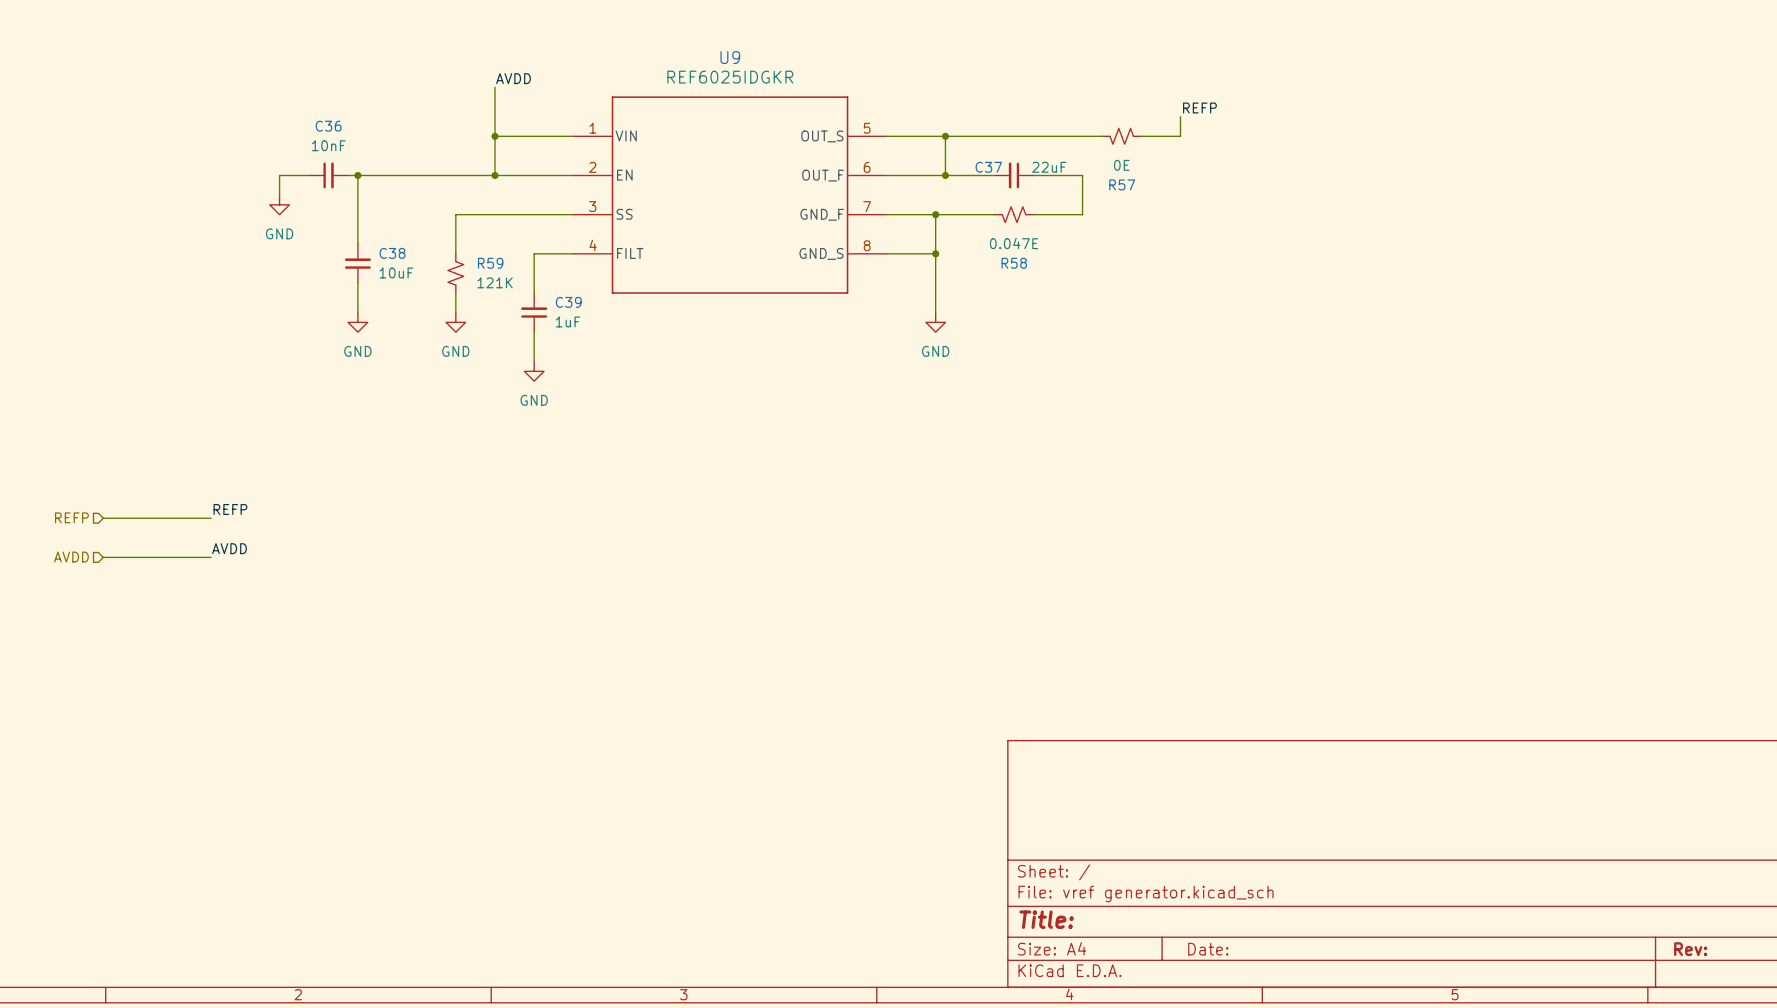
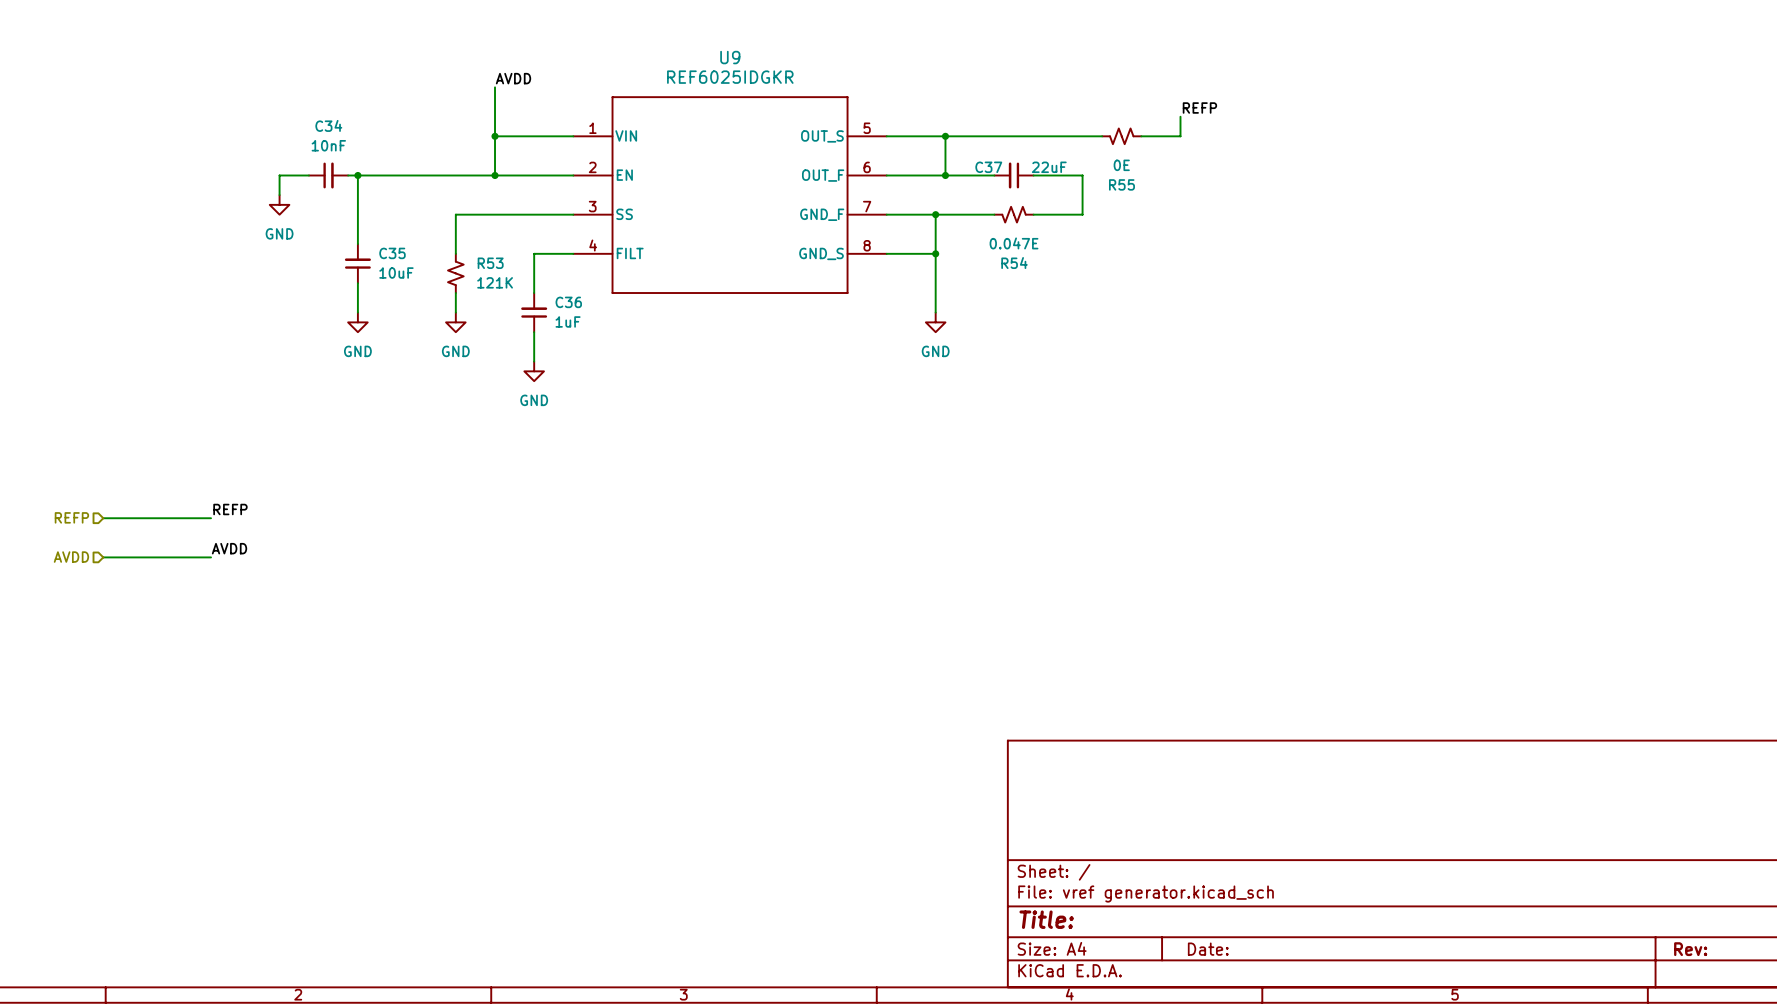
C36 name: C36 (328, 126) -> C34 (328, 125)
R57 name: R57 (1122, 184) -> R55 (1121, 184)
C38 name: C38 (392, 253) -> C35 (392, 253)
R59 name: R59 (490, 263) -> R53 (490, 263)
R58 name: R58 (1014, 263) -> R54 (1014, 263)
C39 name: C39 (568, 302) -> C36 (568, 302)

